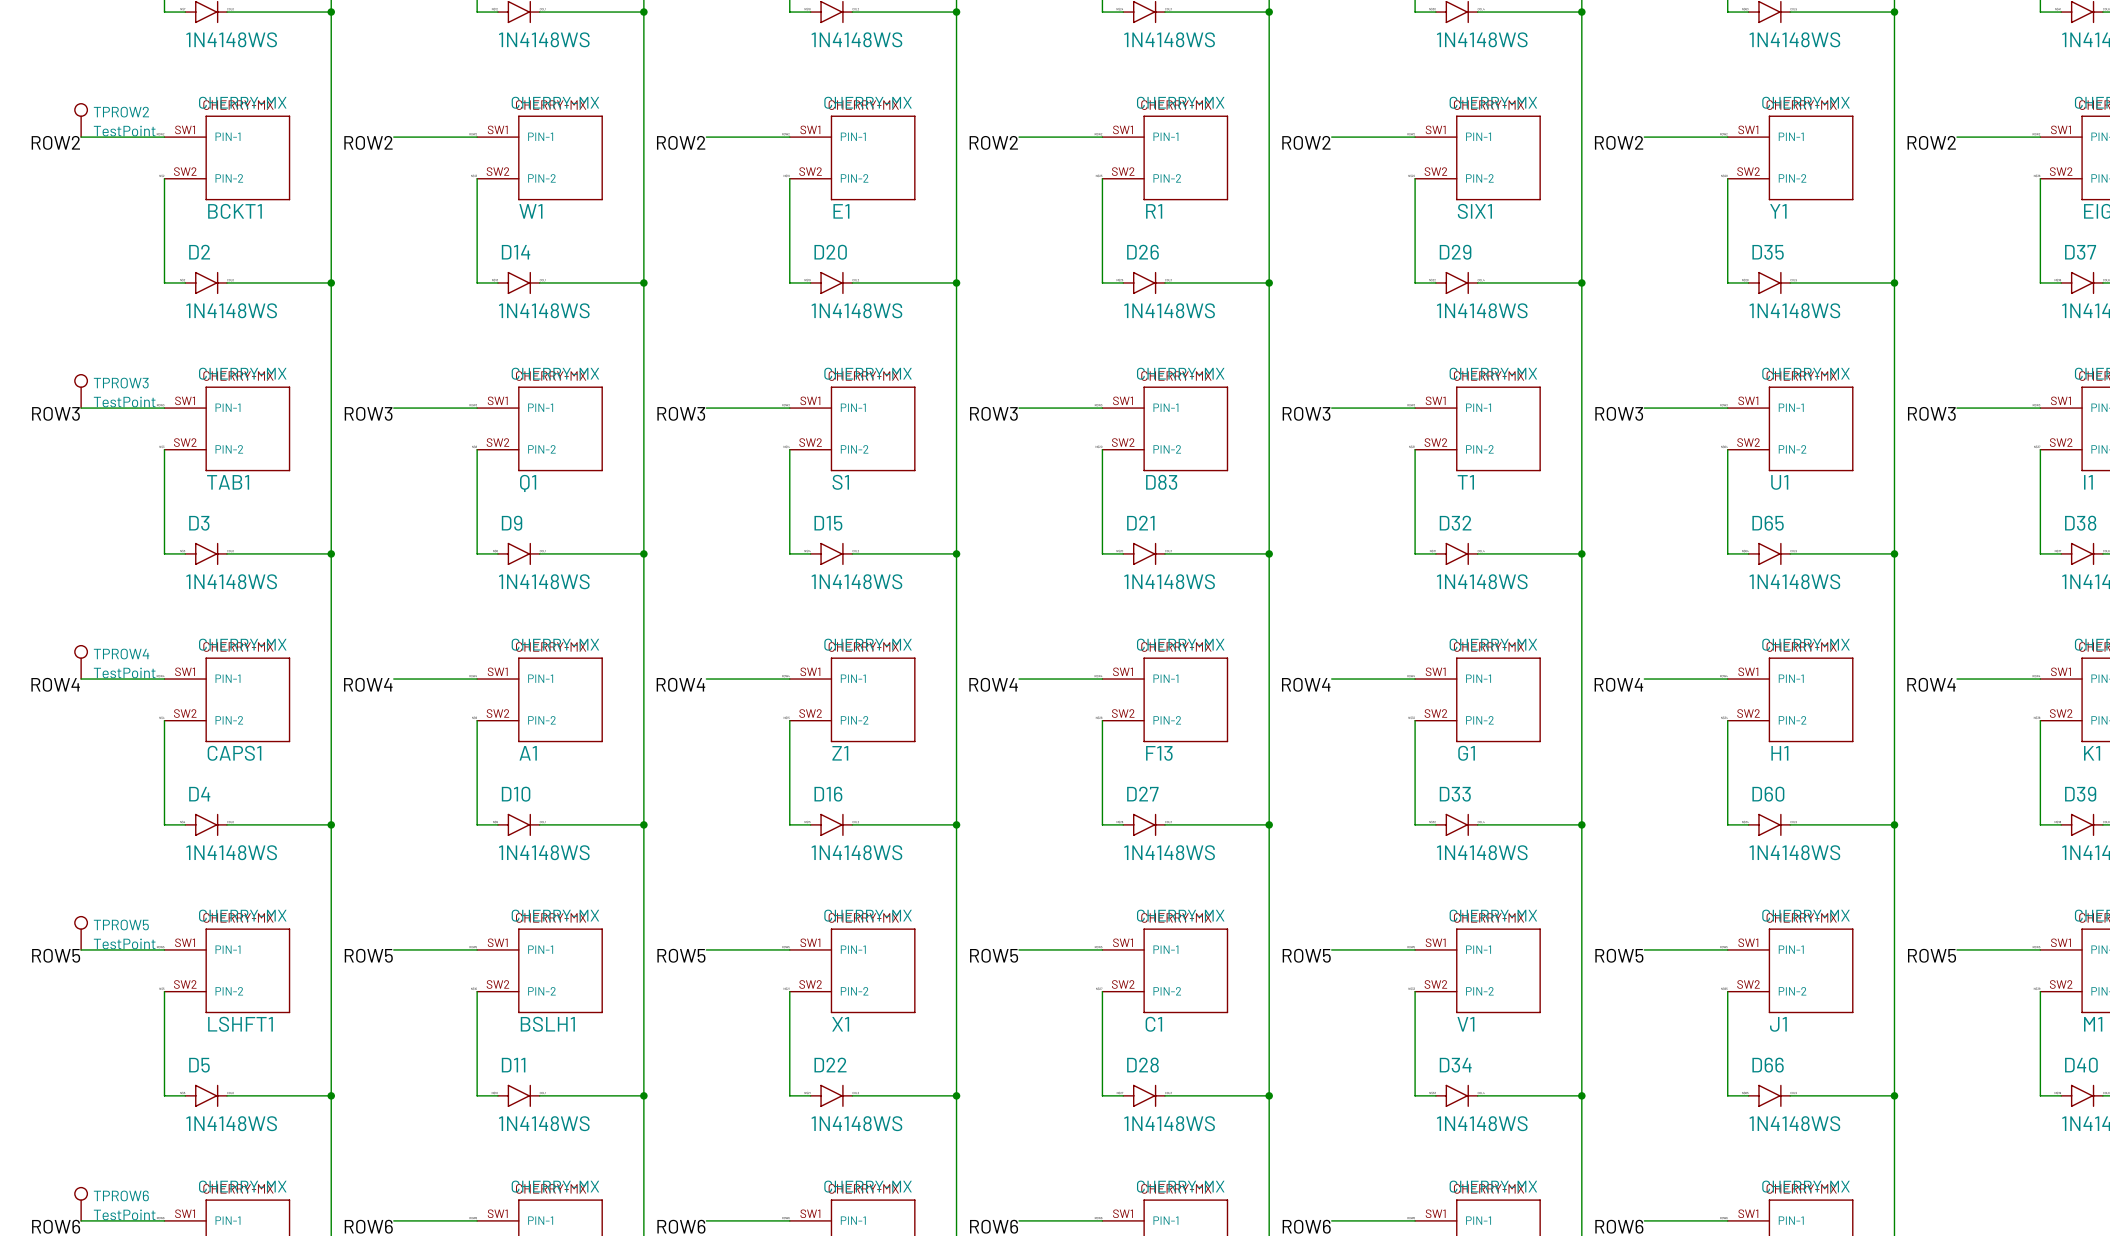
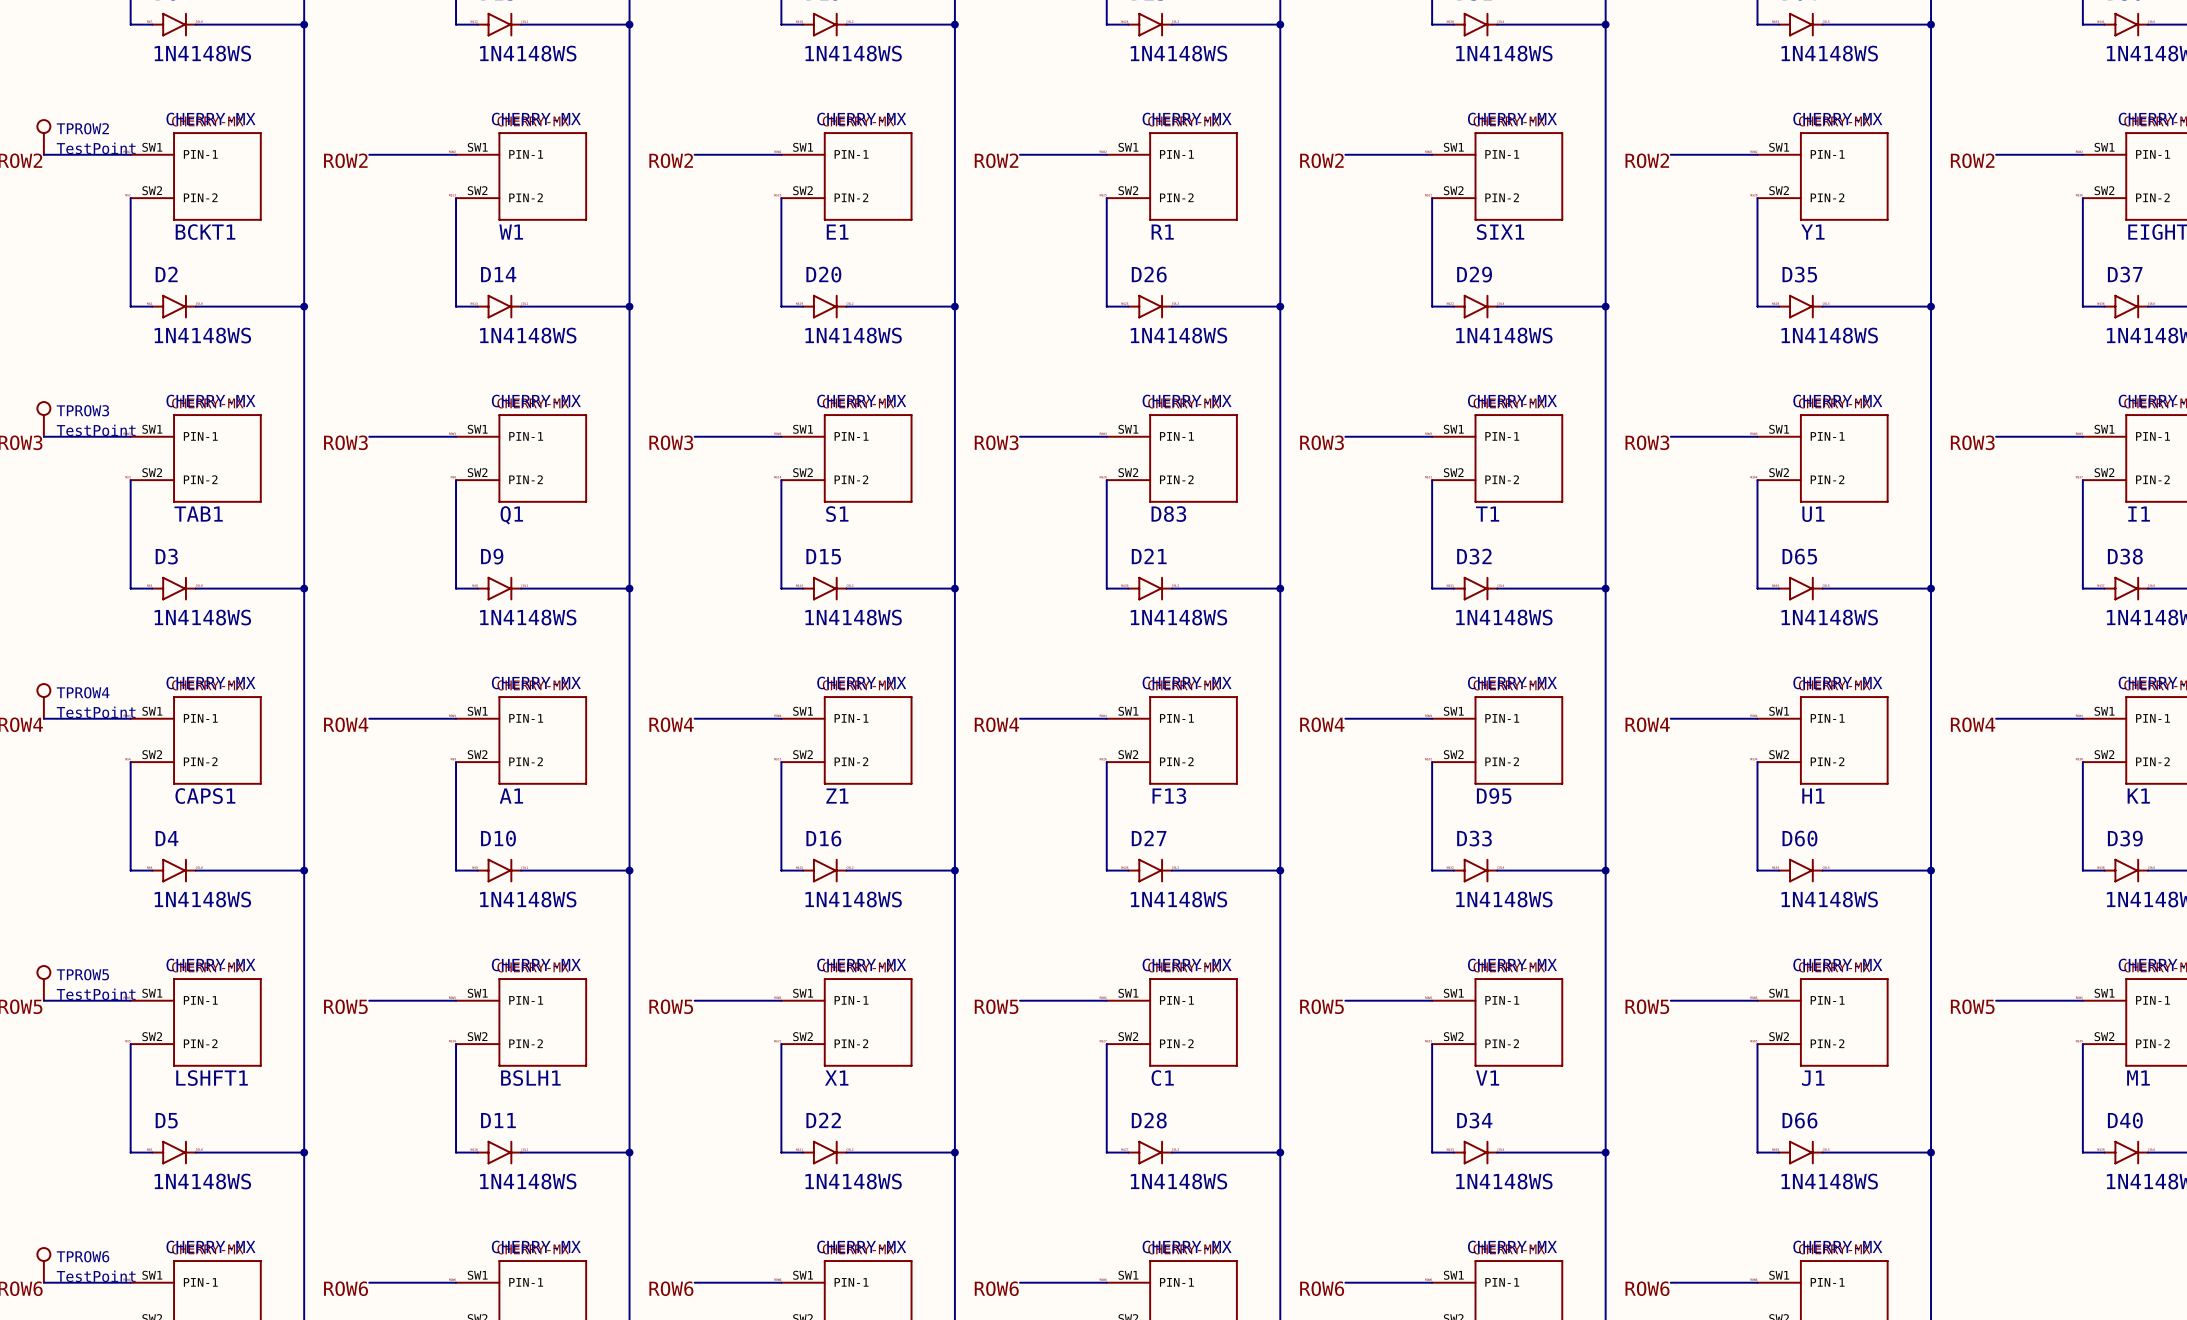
G1 name: G1 (1466, 753) -> D95 (1494, 796)

